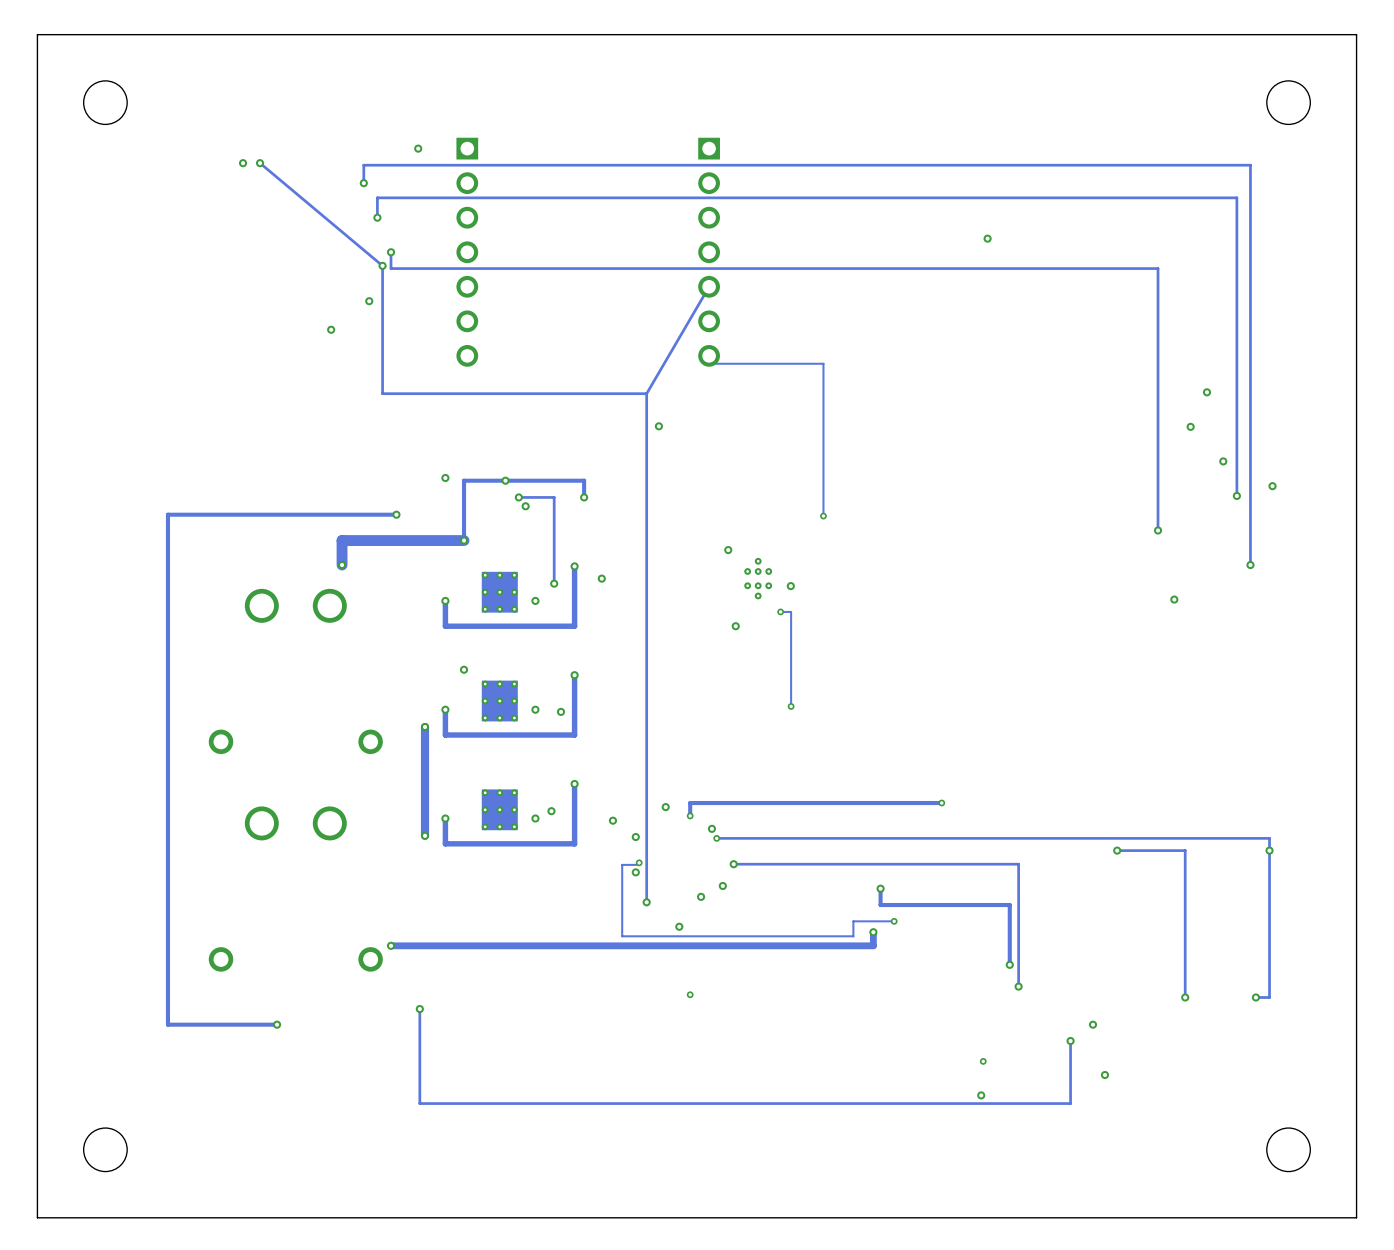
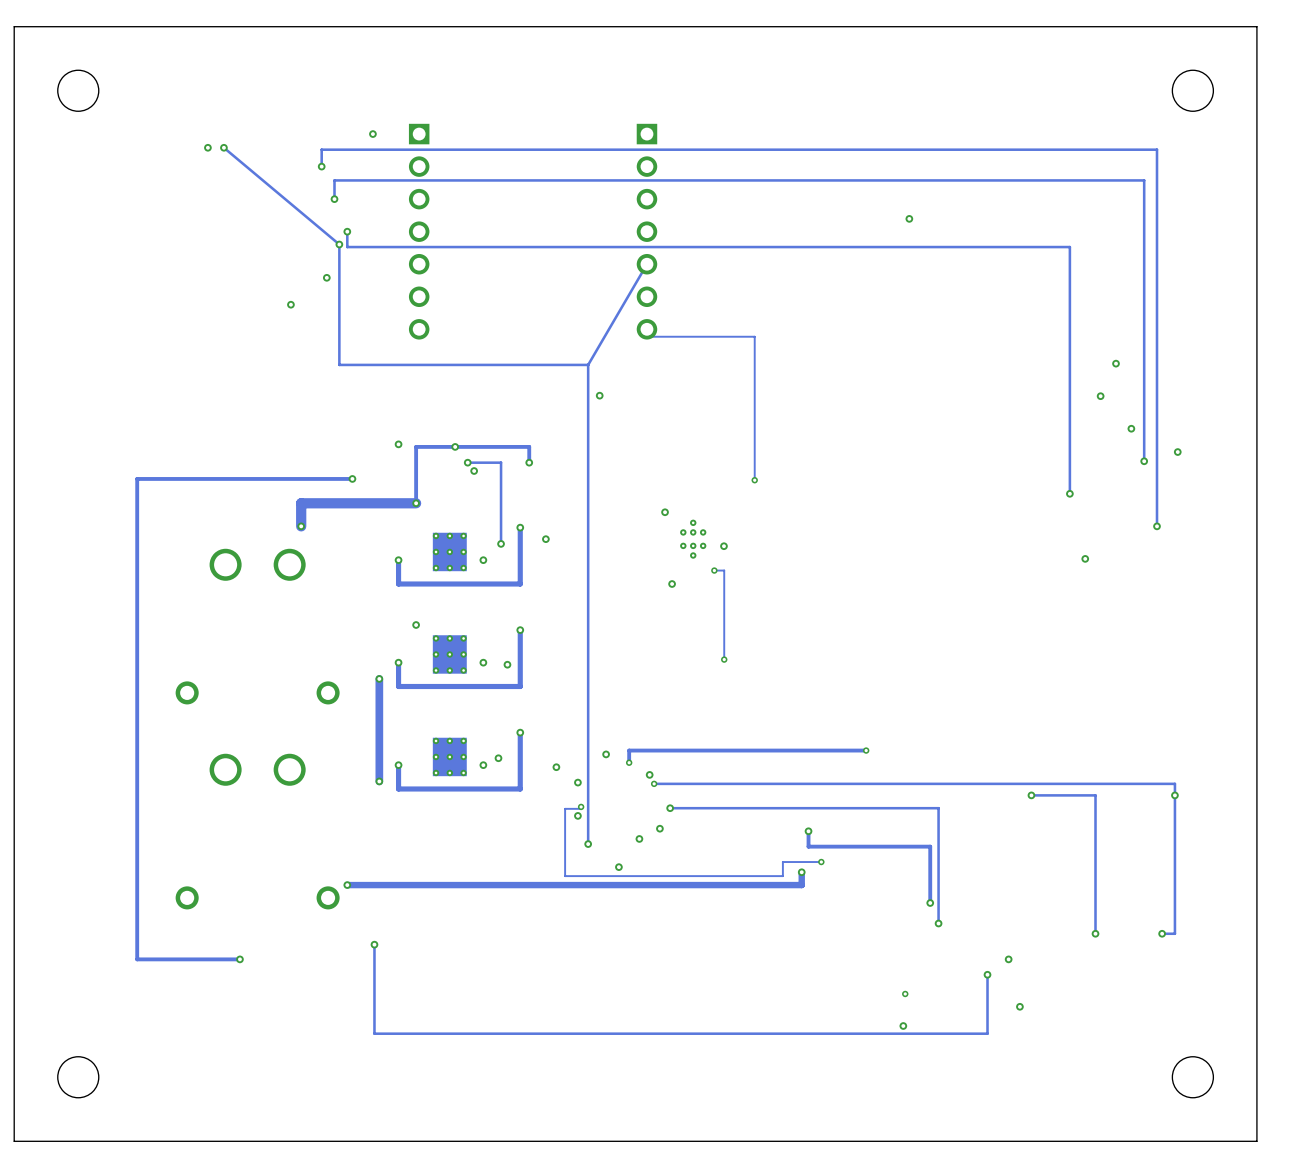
via: (690, 994) -> none

